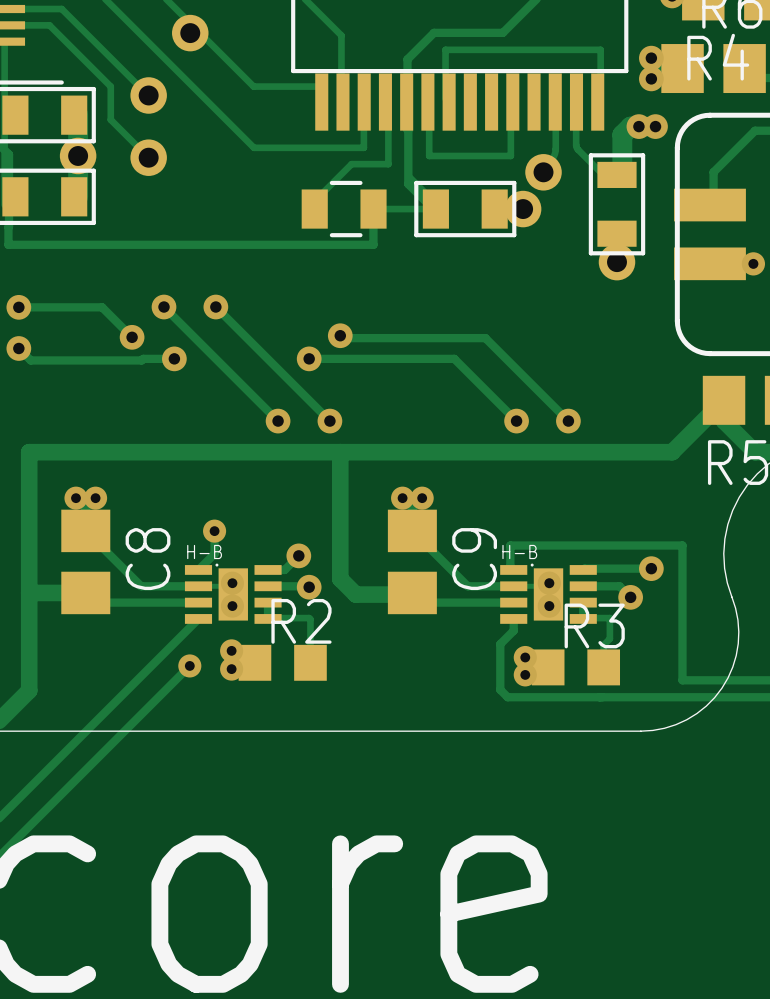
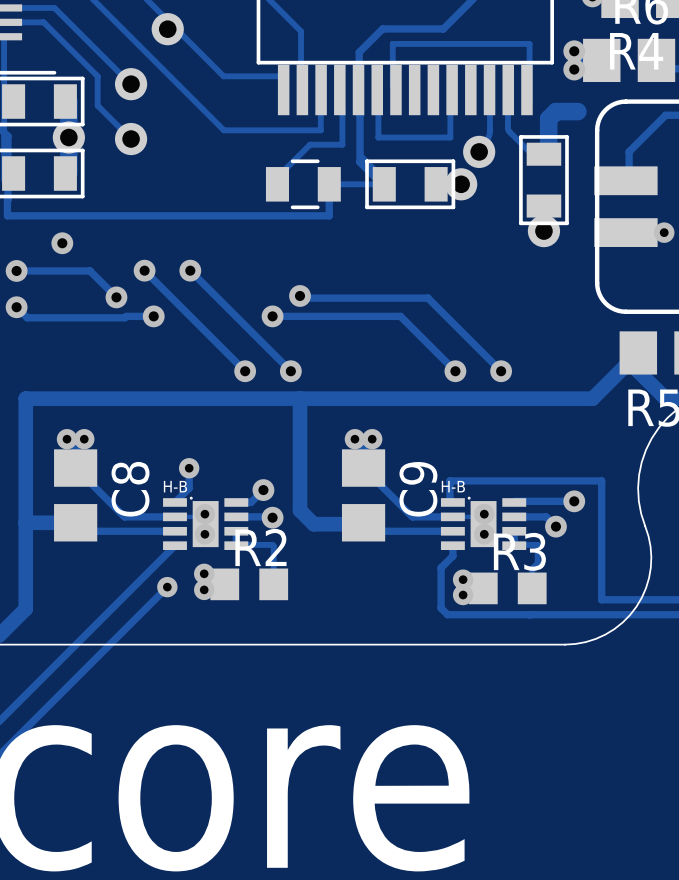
via: (638, 126) -> none
via: (655, 126) -> none
via: none -> (62, 243)

